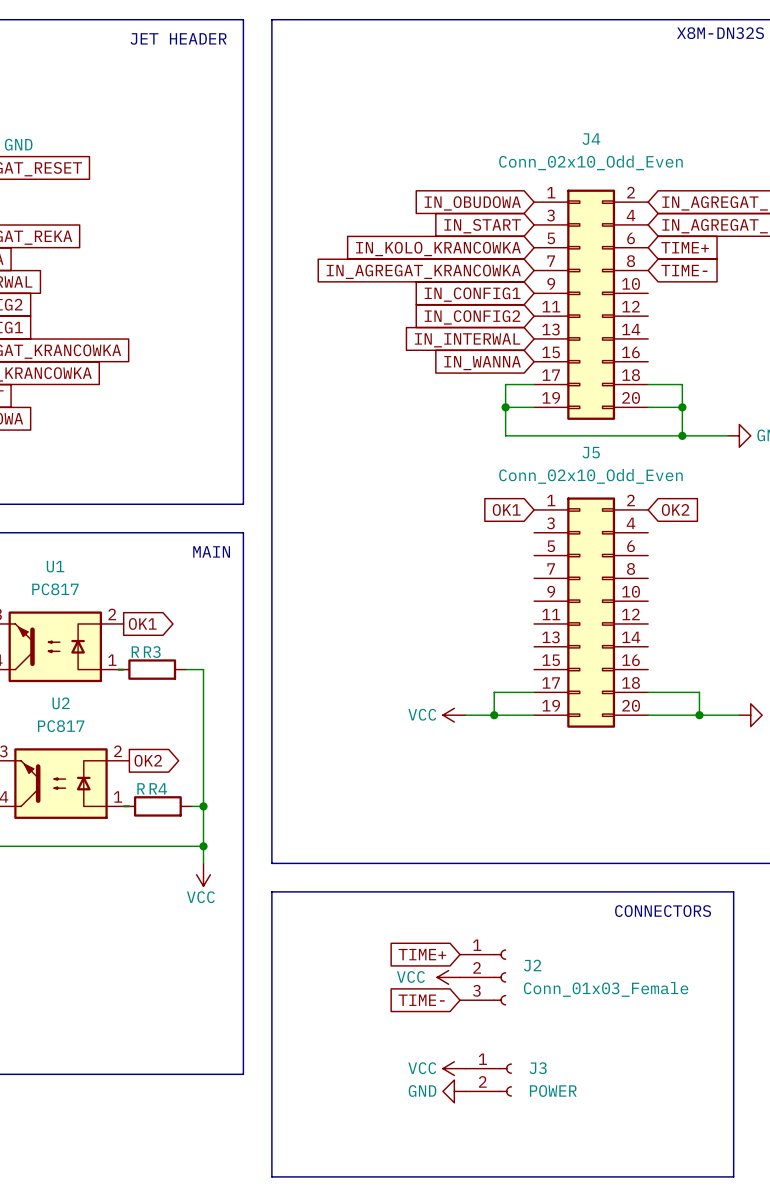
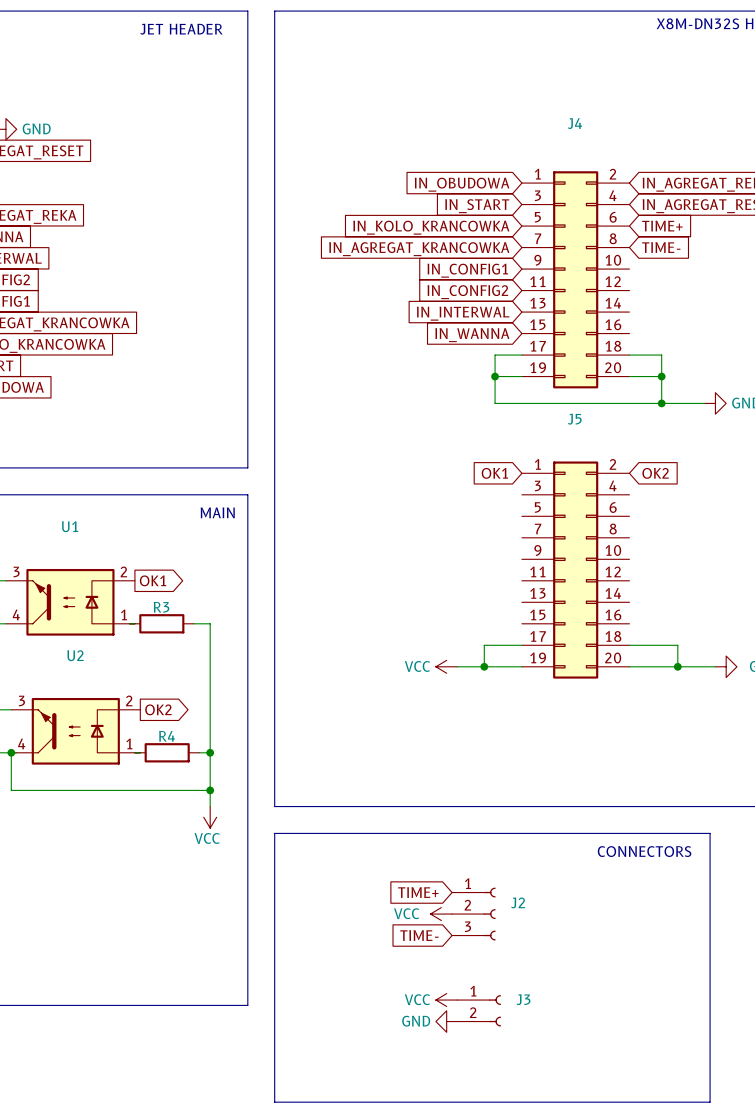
J4 value: Conn_02x10_Odd_Even (590, 162) -> none
J5 value: Conn_02x10_Odd_Even (590, 476) -> none
U1 value: PC817 (55, 589) -> none
R3 value: R (135, 652) -> none
U2 value: PC817 (61, 726) -> none
R4 value: R (141, 788) -> none
J2 value: Conn_01x03_Female (606, 989) -> none
J3 value: POWER (553, 1091) -> none

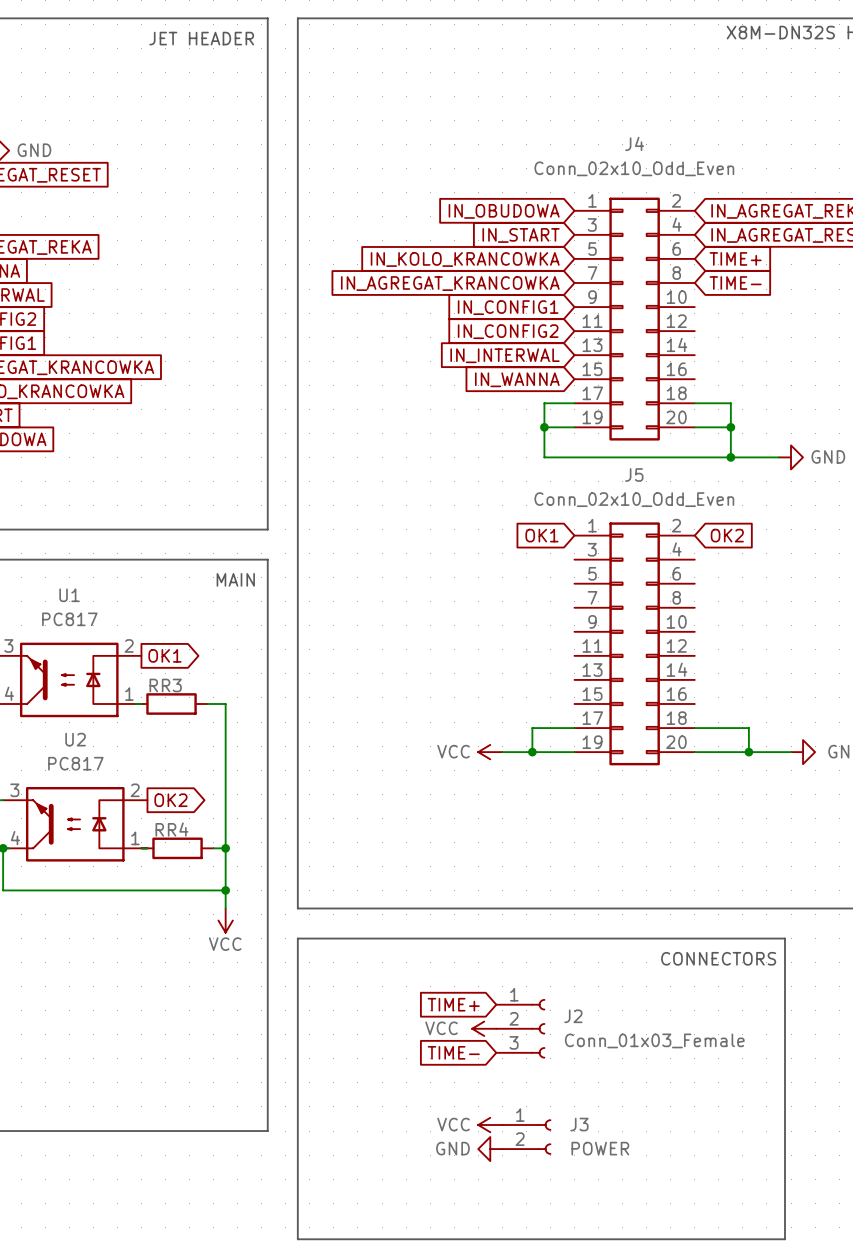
J4 value: none -> Conn_02x10_Odd_Even (634, 168)
J5 value: none -> Conn_02x10_Odd_Even (634, 499)
U1 value: none -> PC817 (69, 619)
R3 value: none -> R (153, 685)
U2 value: none -> PC817 (75, 763)
R4 value: none -> R (159, 829)
J2 value: none -> Conn_01x03_Female (654, 1040)
J3 value: none -> POWER (600, 1148)

